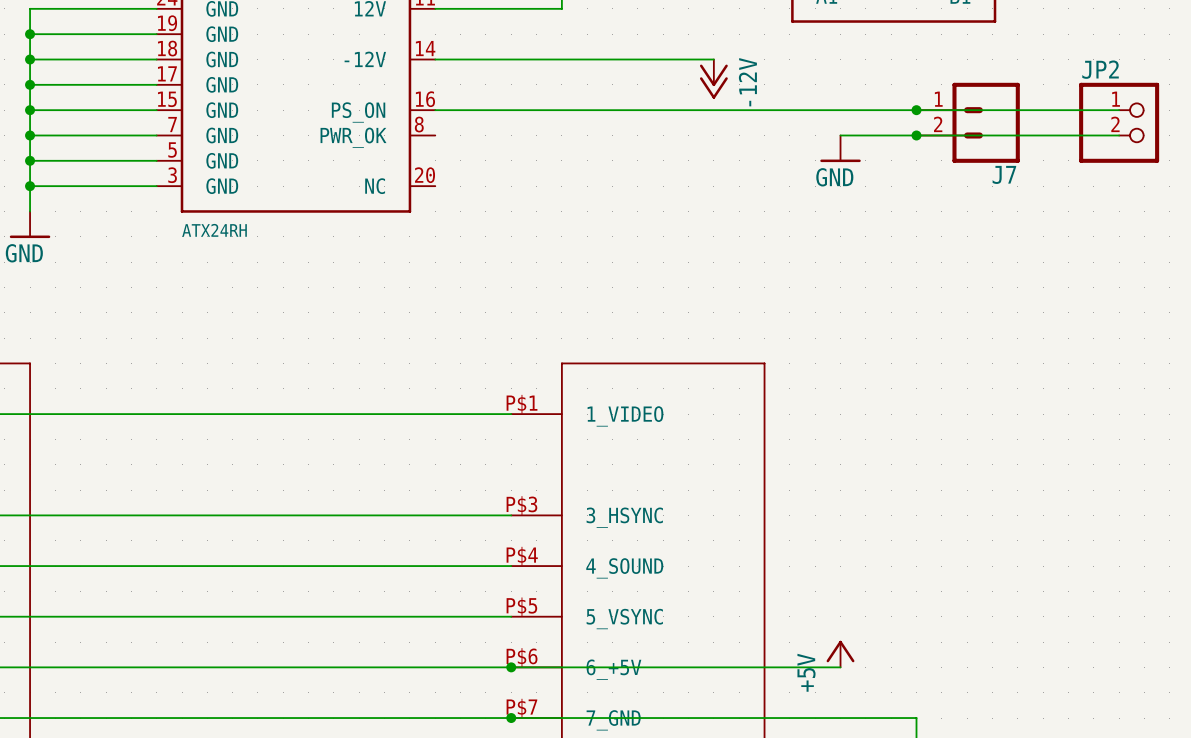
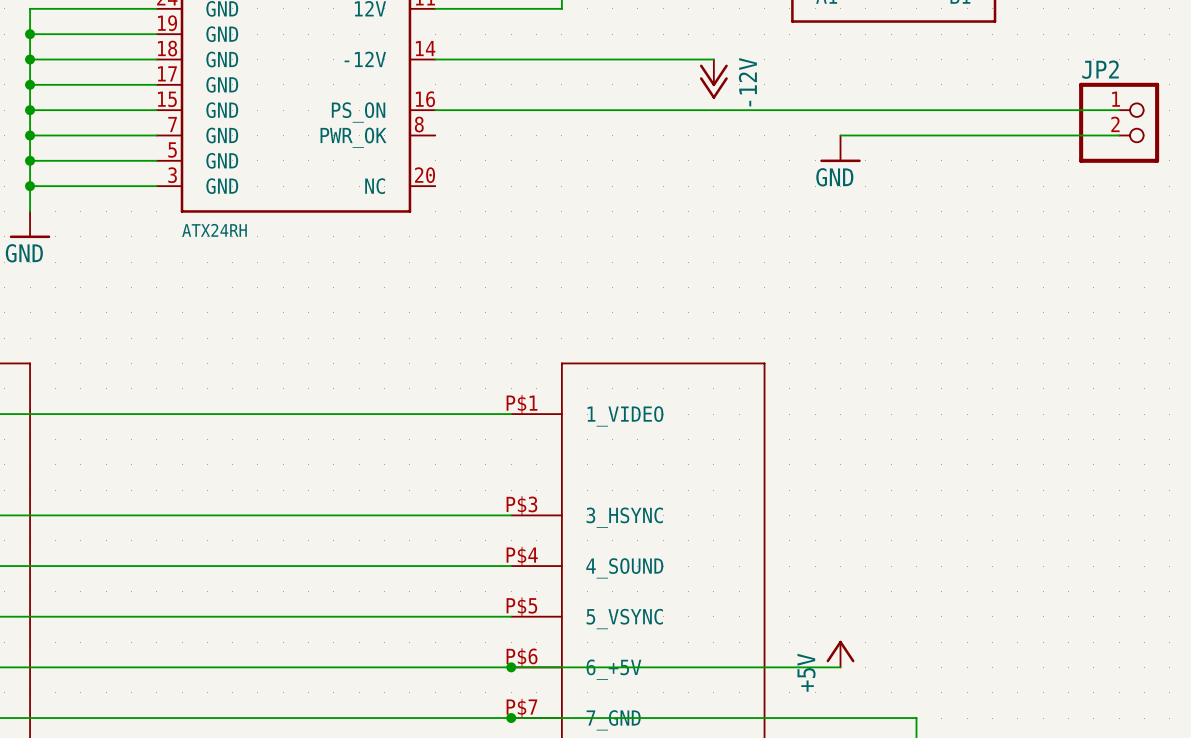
junction: (916, 110) -> none
J7: (968, 122) -> none
junction: (916, 135) -> none

